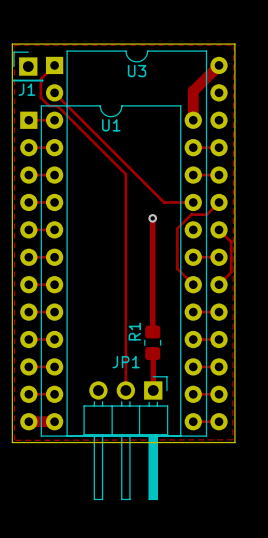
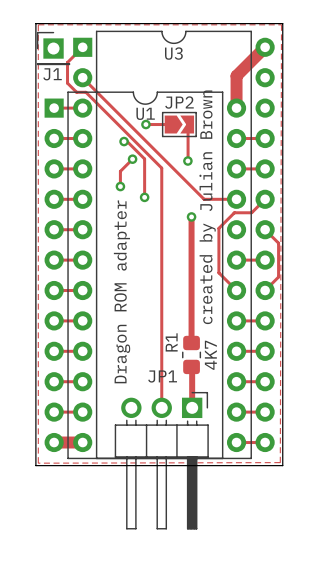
track: none -> (145, 124) (170, 124)
via: none -> (145, 124)
JP2: none -> (179, 124)
track: none -> (188, 124) (188, 160)
track: none -> (124, 141) (127, 141) (144, 158) (144, 197)
via: none -> (124, 141)
track: none -> (132, 159) (120, 171) (120, 186)
via: none -> (132, 159)
via: none -> (187, 161)
via: none -> (120, 186)
via: none -> (144, 197)
text: none -> created by Julian Brown (207, 207)
text: none -> Dragon ROM adapter (122, 291)
R1 value: none -> 4K7 (210, 355)

